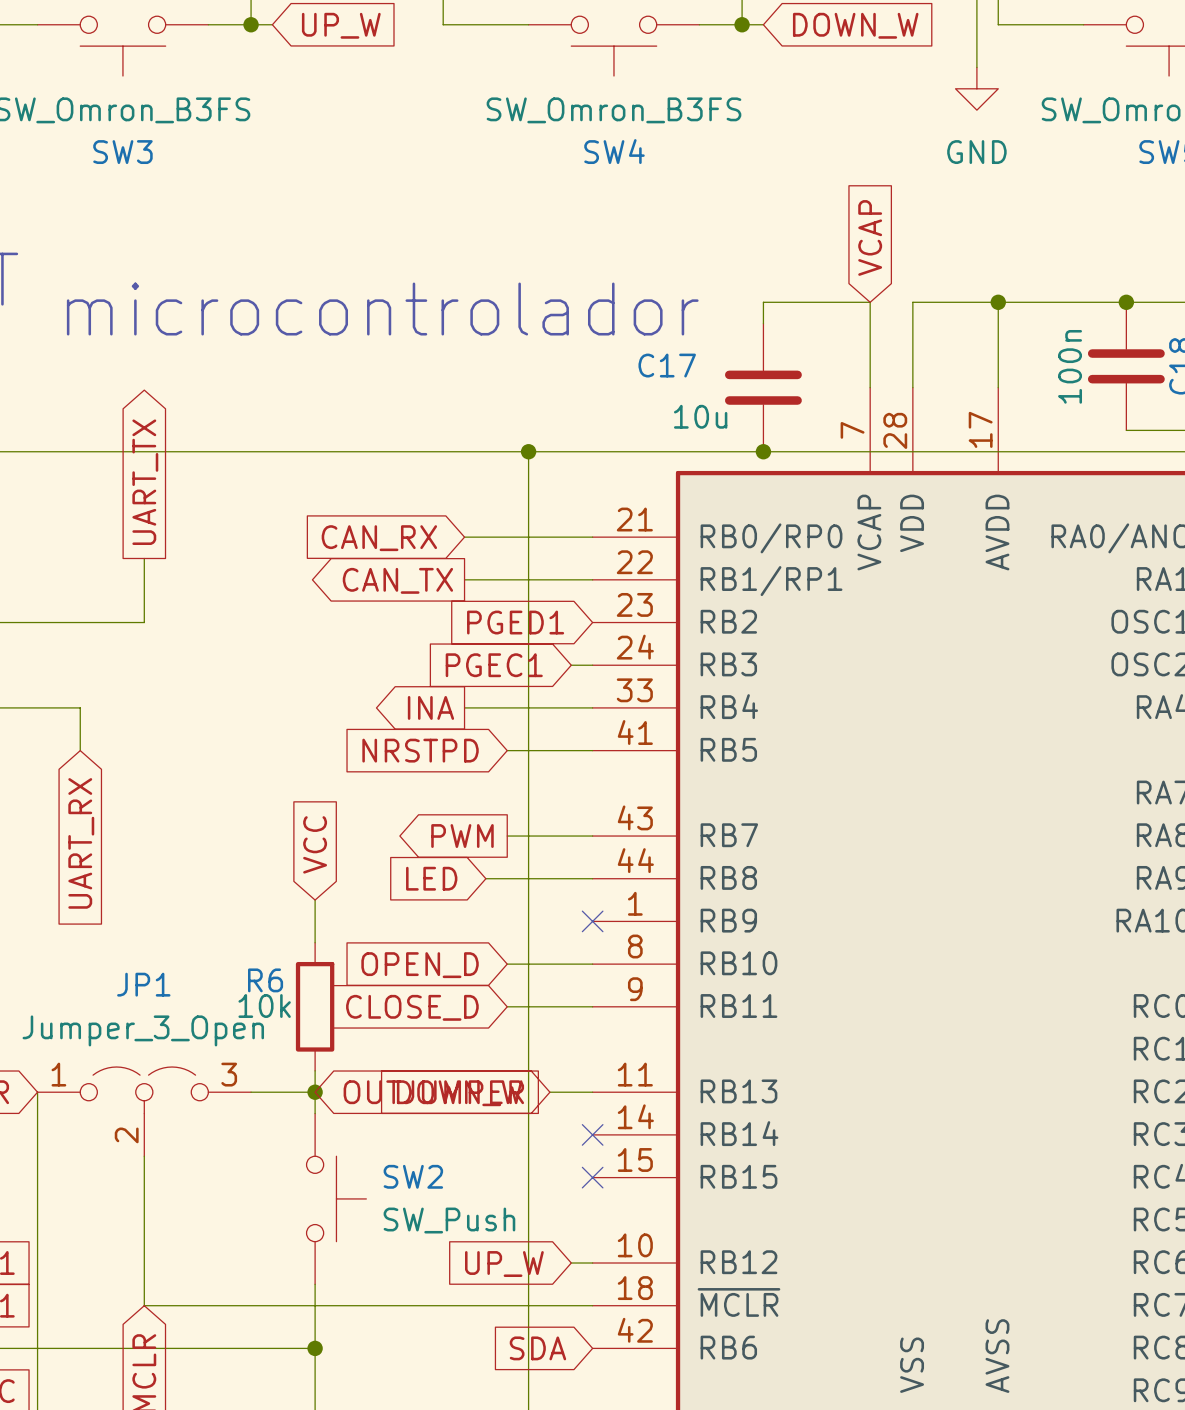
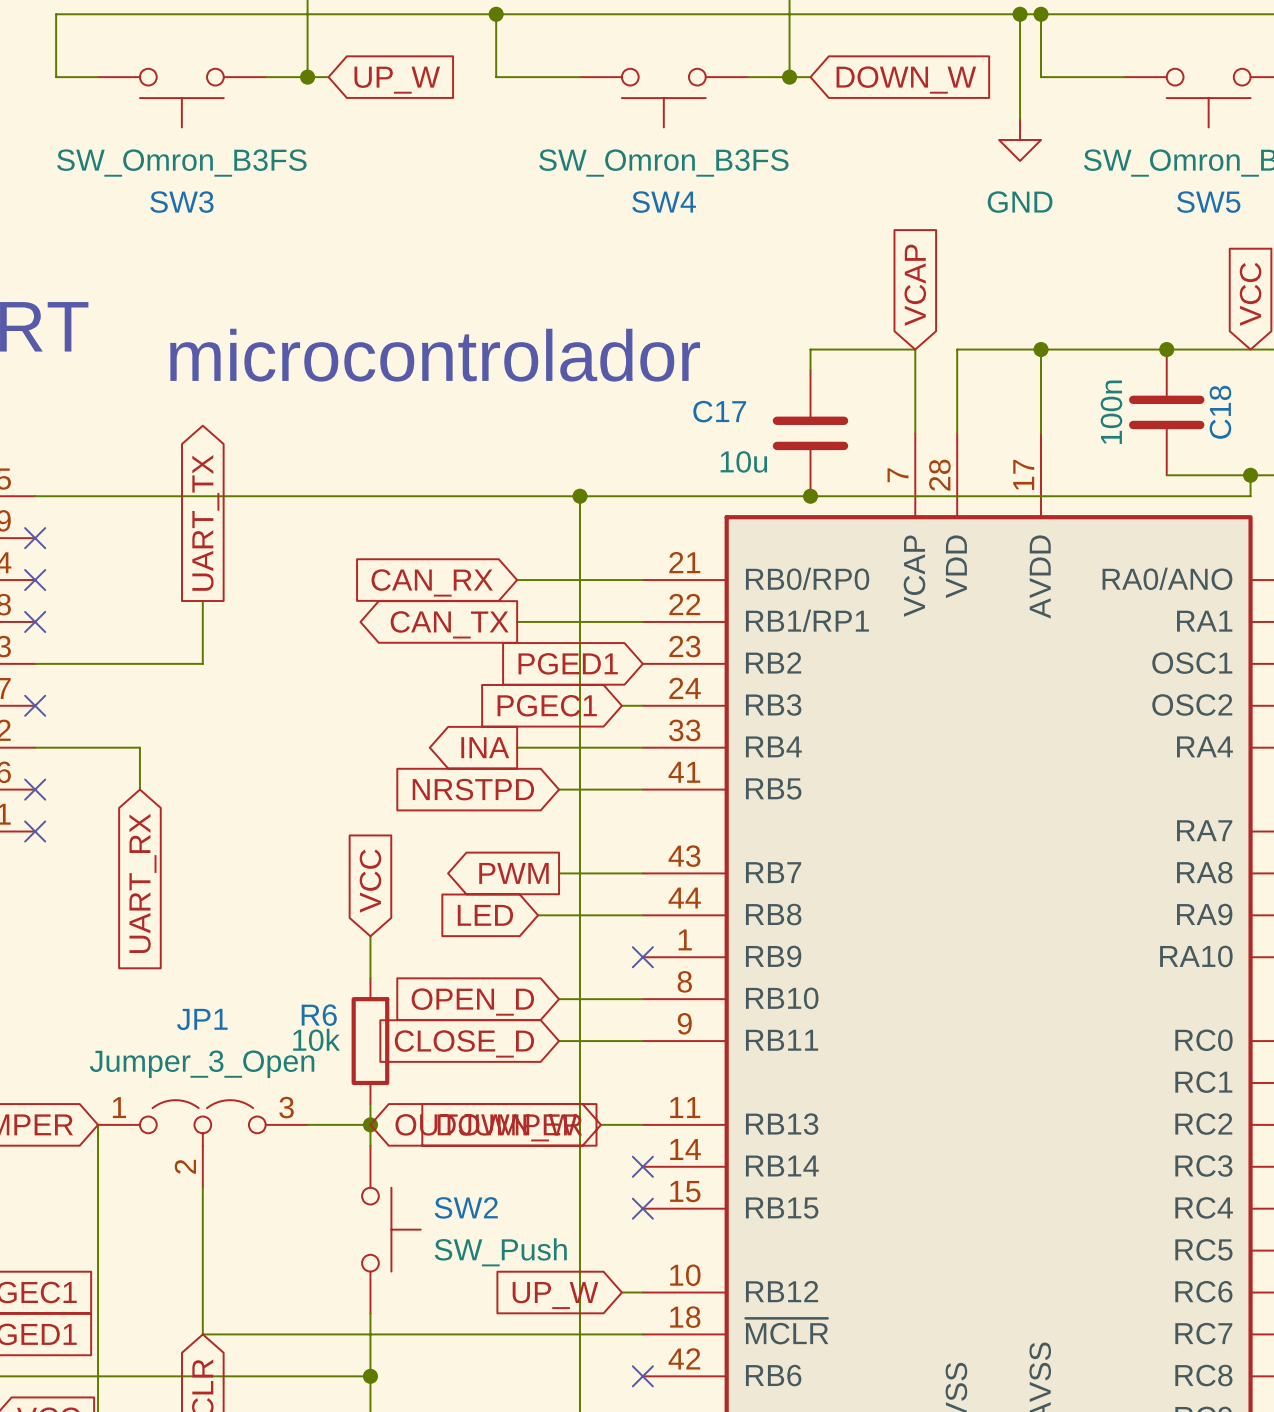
global label: SDA (537, 1348) -> none
no-connect mark: none -> (642, 1376)

